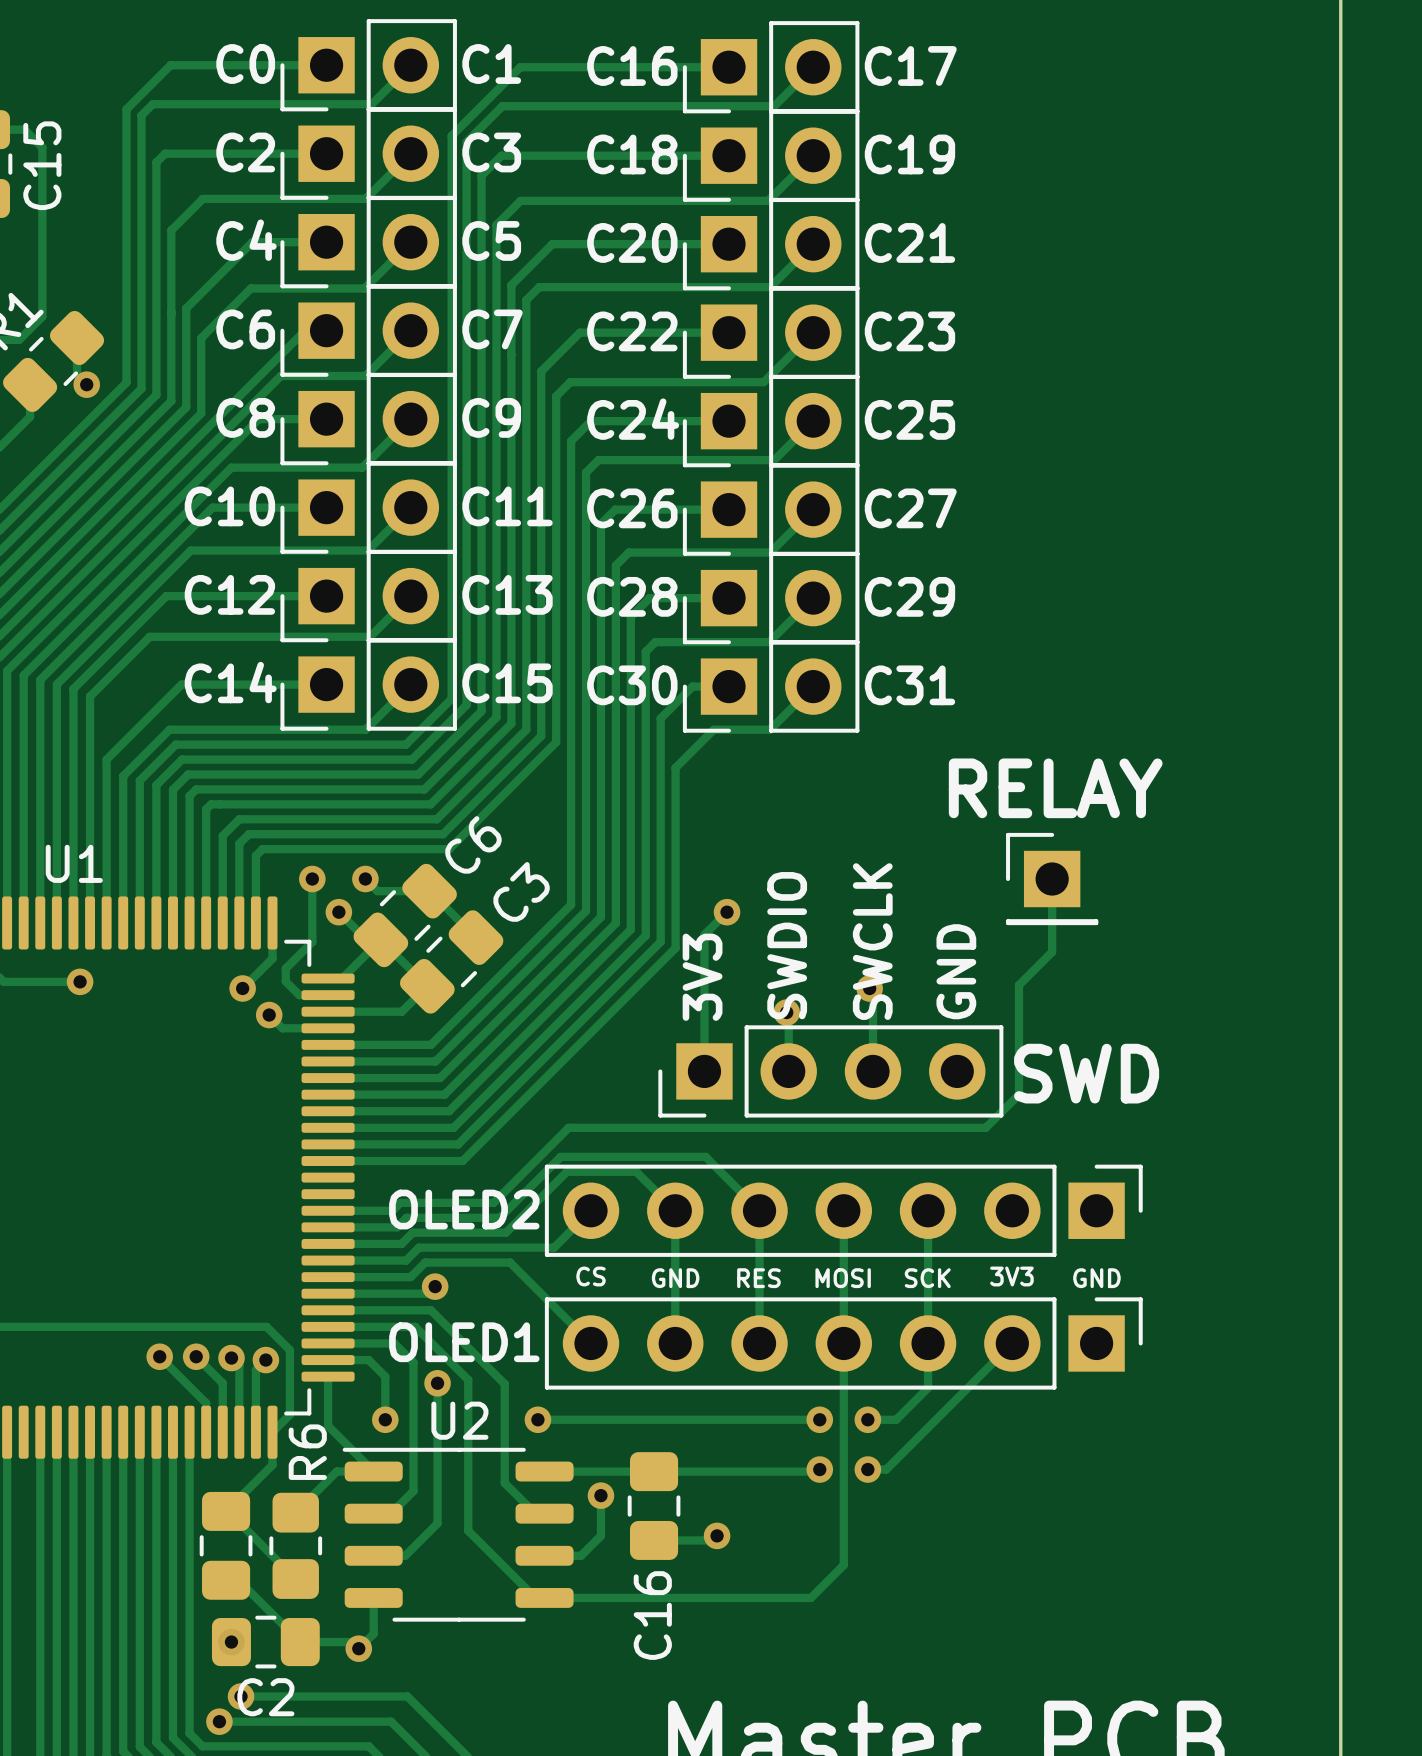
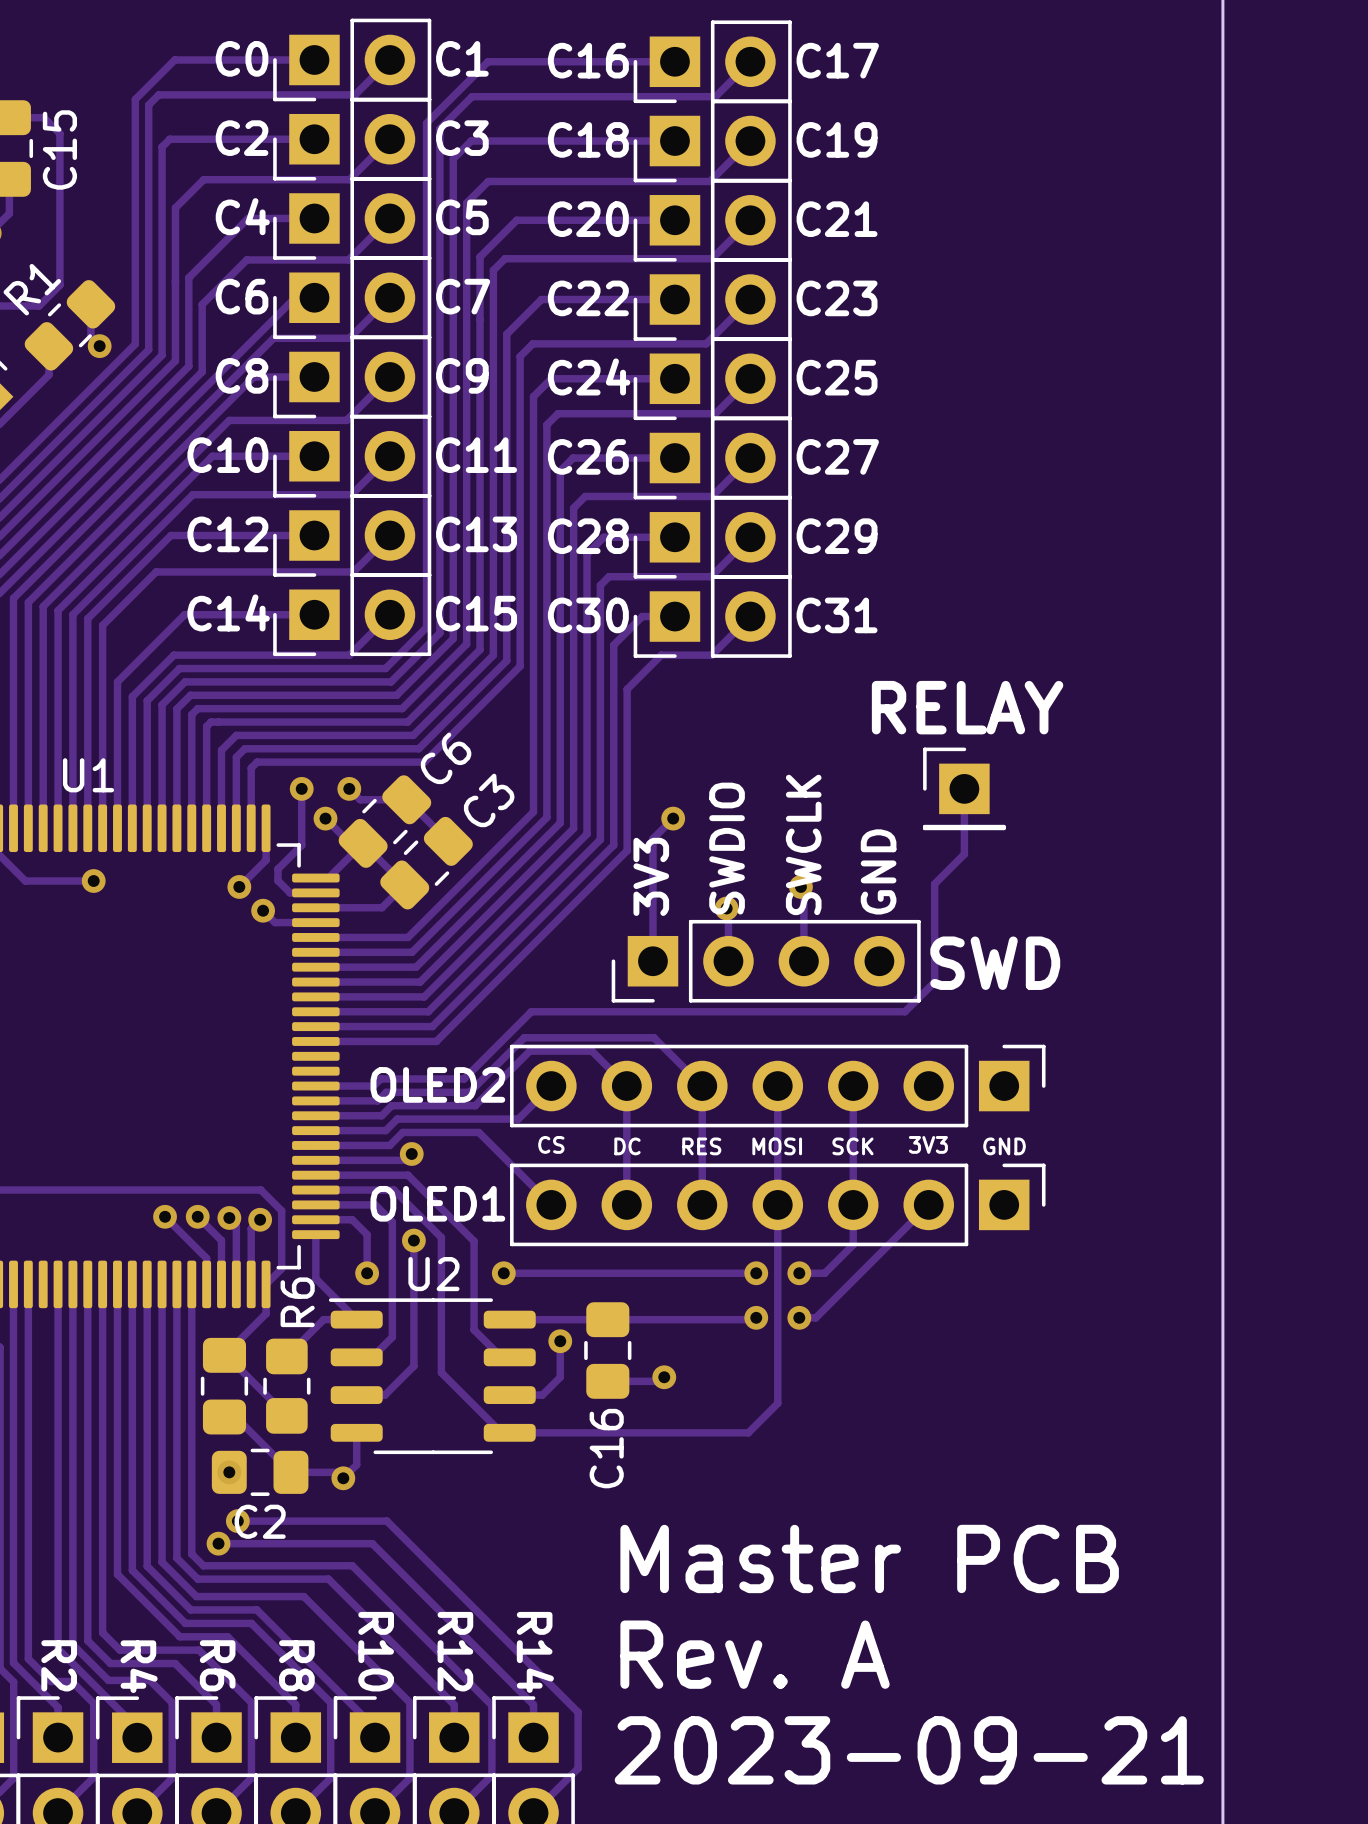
text: GND (675, 1278) -> DC (627, 1146)

